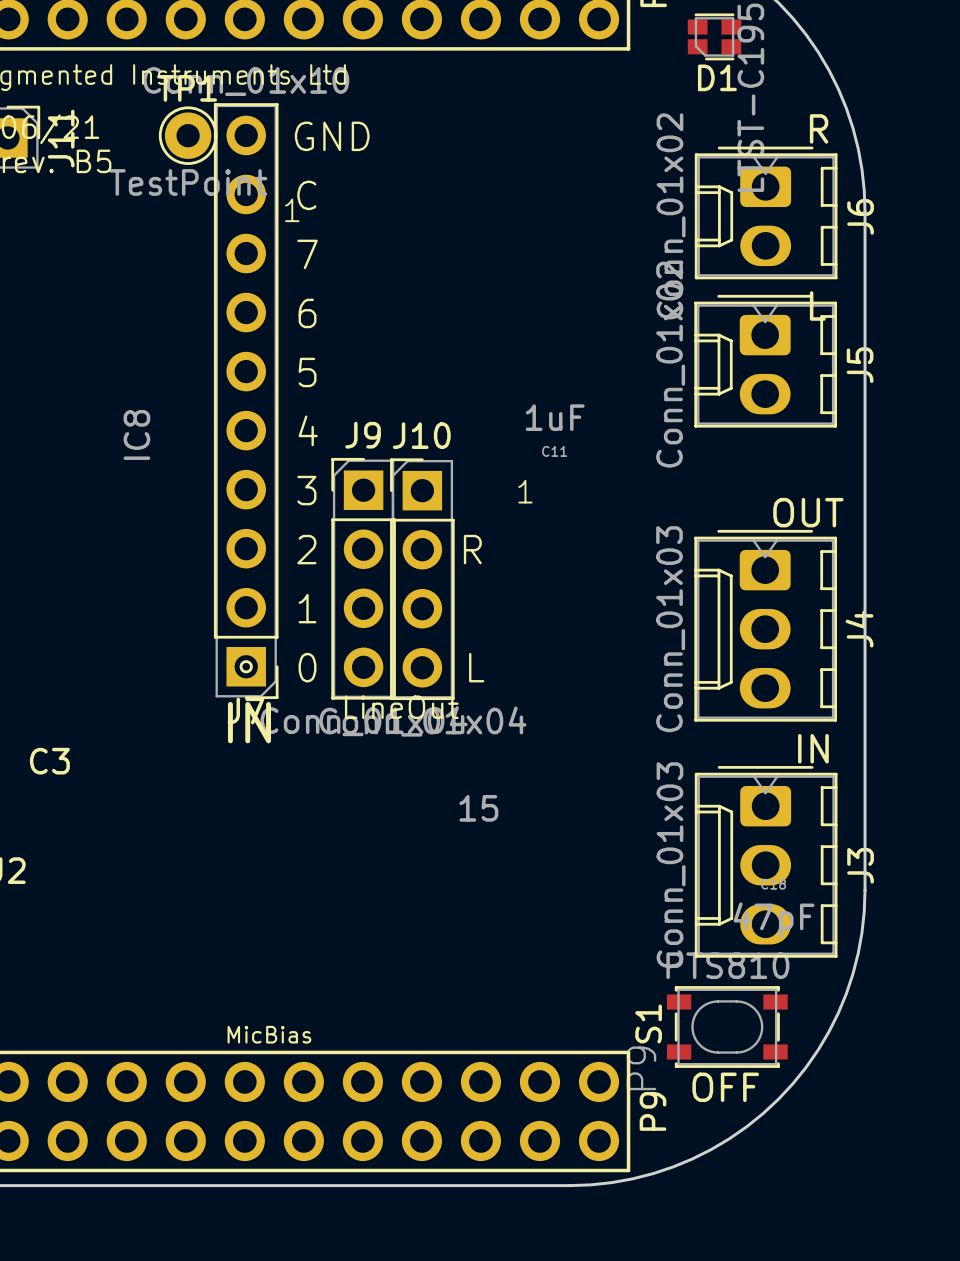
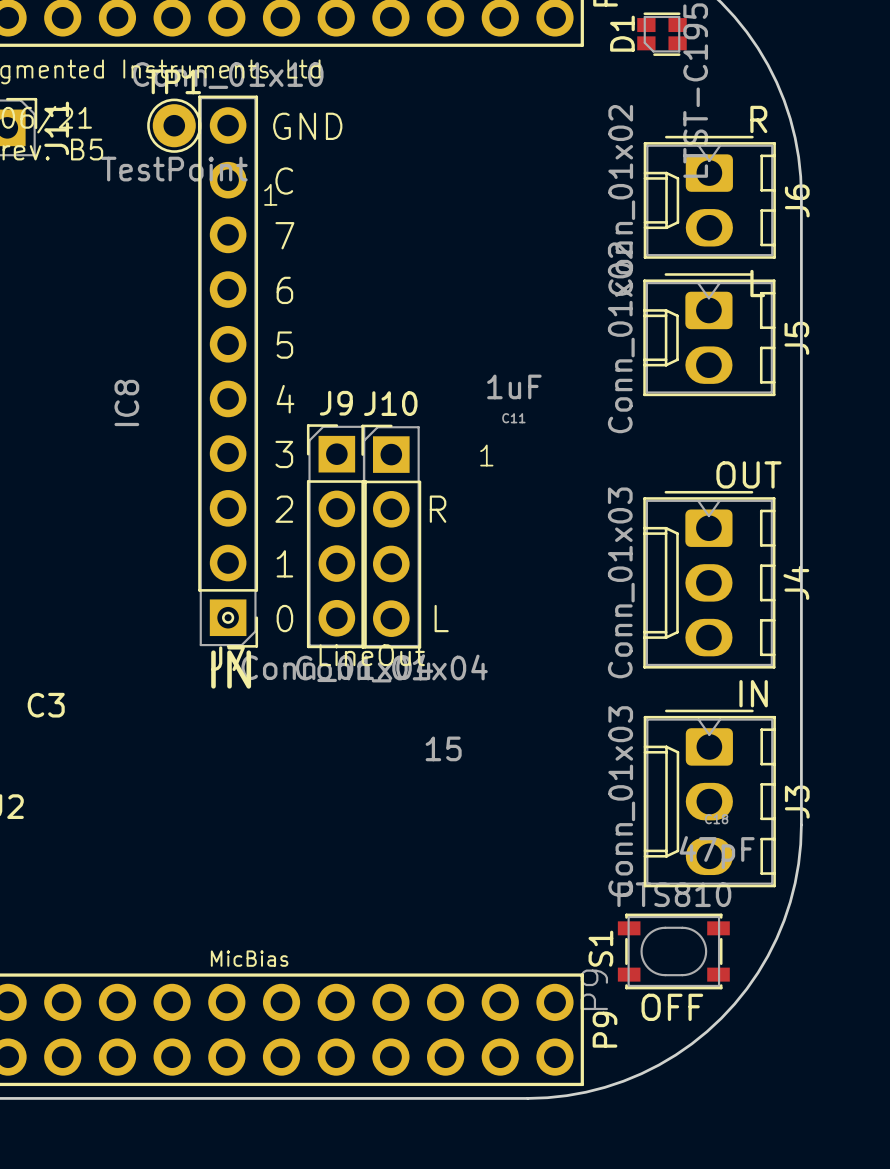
D1 name rotation: 0° (717, 77) -> 90° counterclockwise (622, 33)
D1 name position: D1 (717, 77) -> D1 (622, 33)

